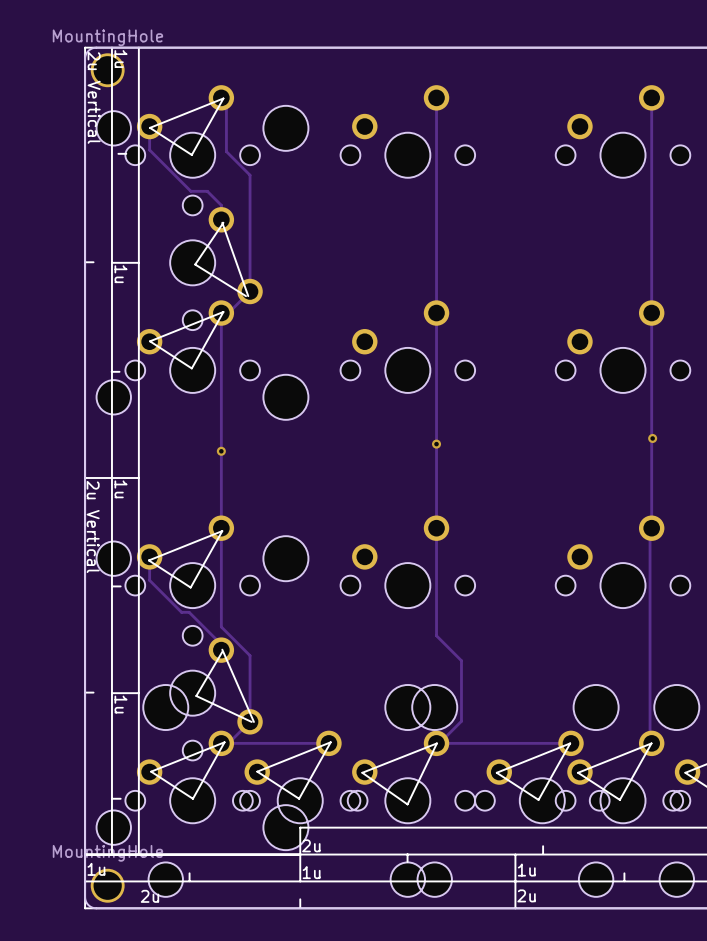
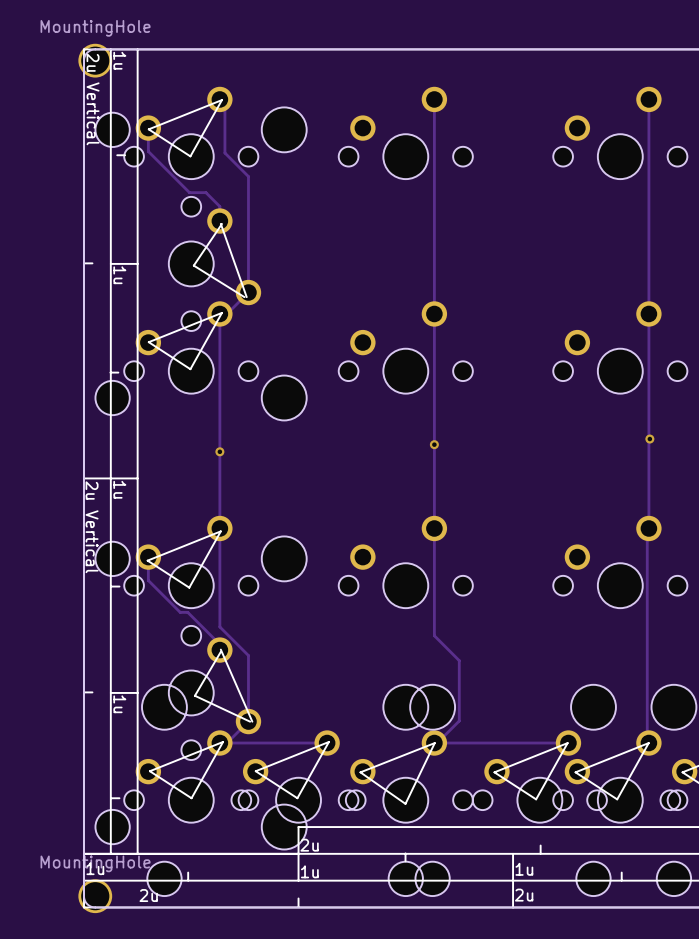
part position: (107, 70) -> (95, 60)
part position: (107, 885) -> (95, 896)

